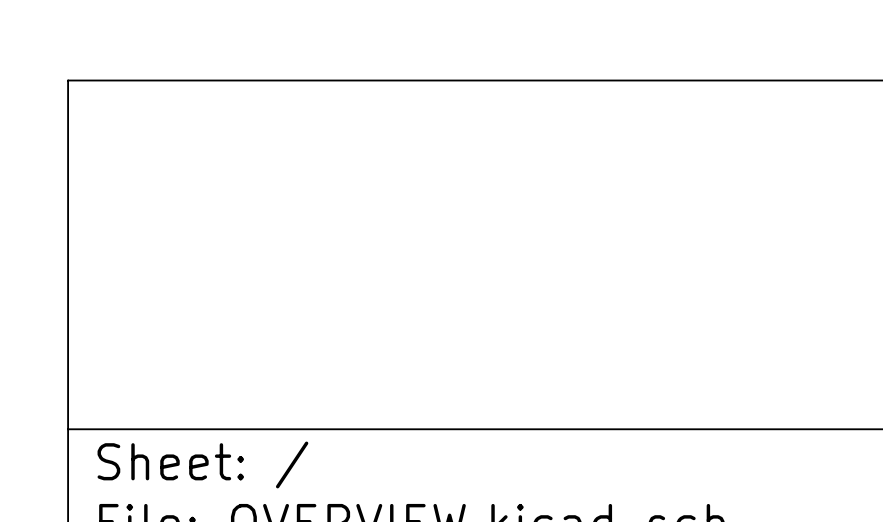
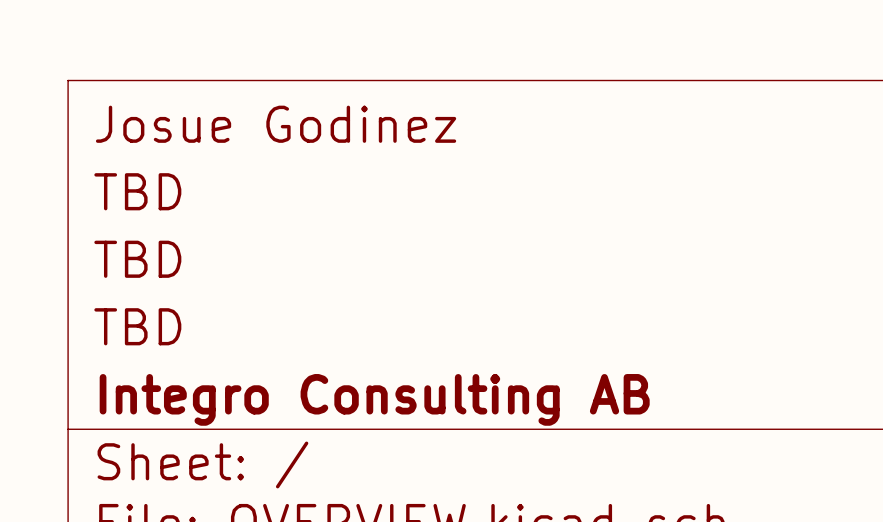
title block: none -> Josue Godinez (276, 124)
title block: none -> TBD (137, 191)
title block: none -> TBD (137, 259)
title block: none -> TBD (137, 326)
title block: none -> Integro Consulting AB (374, 399)

